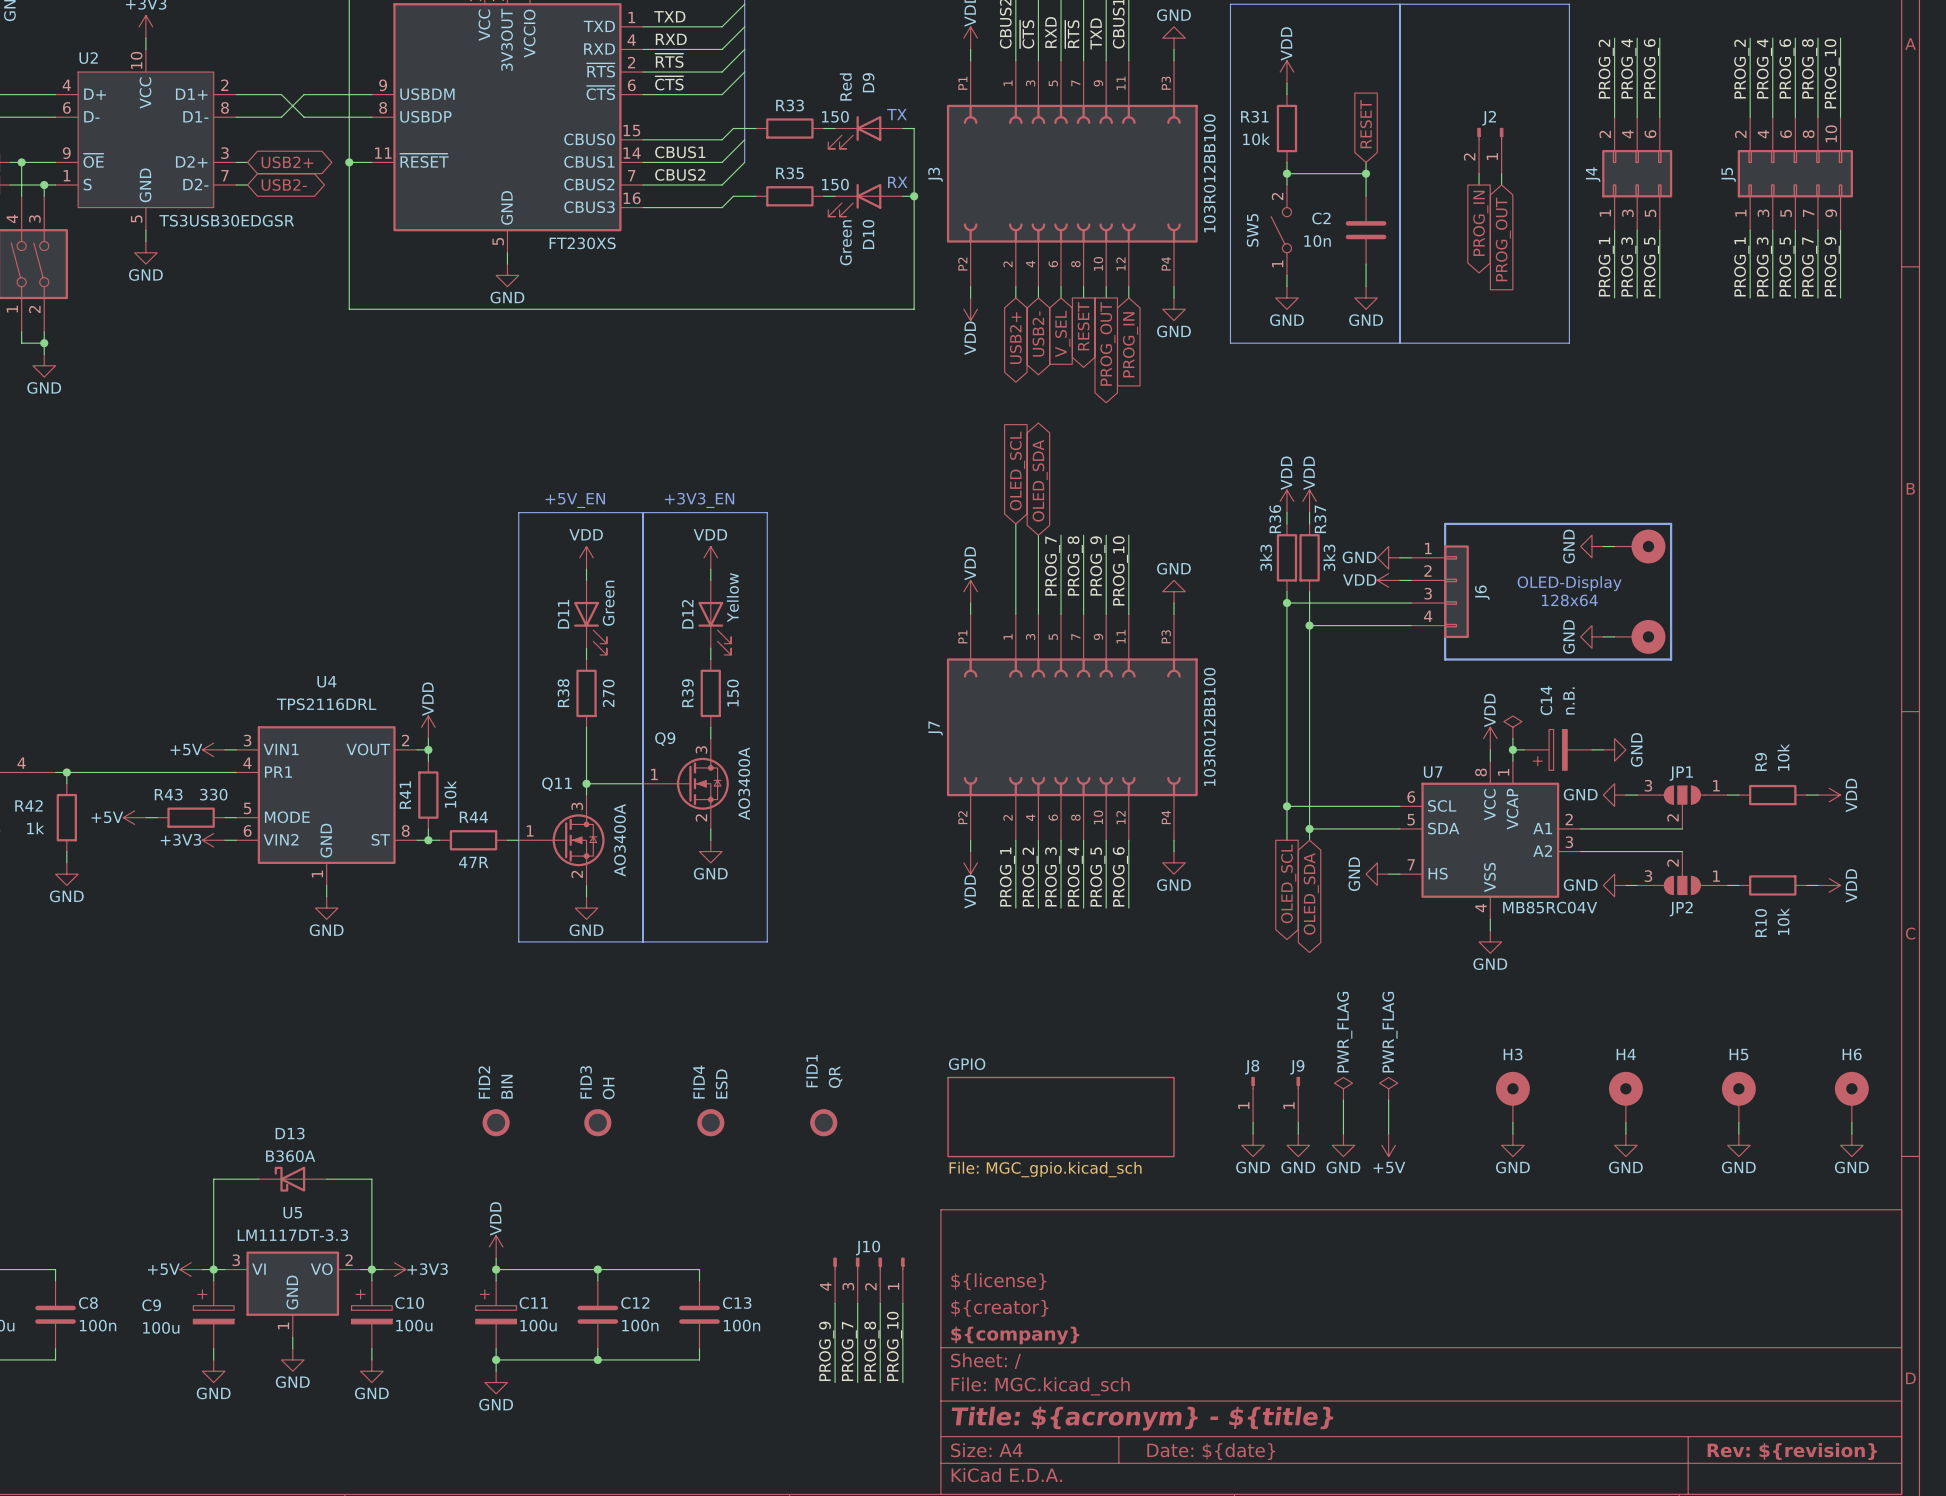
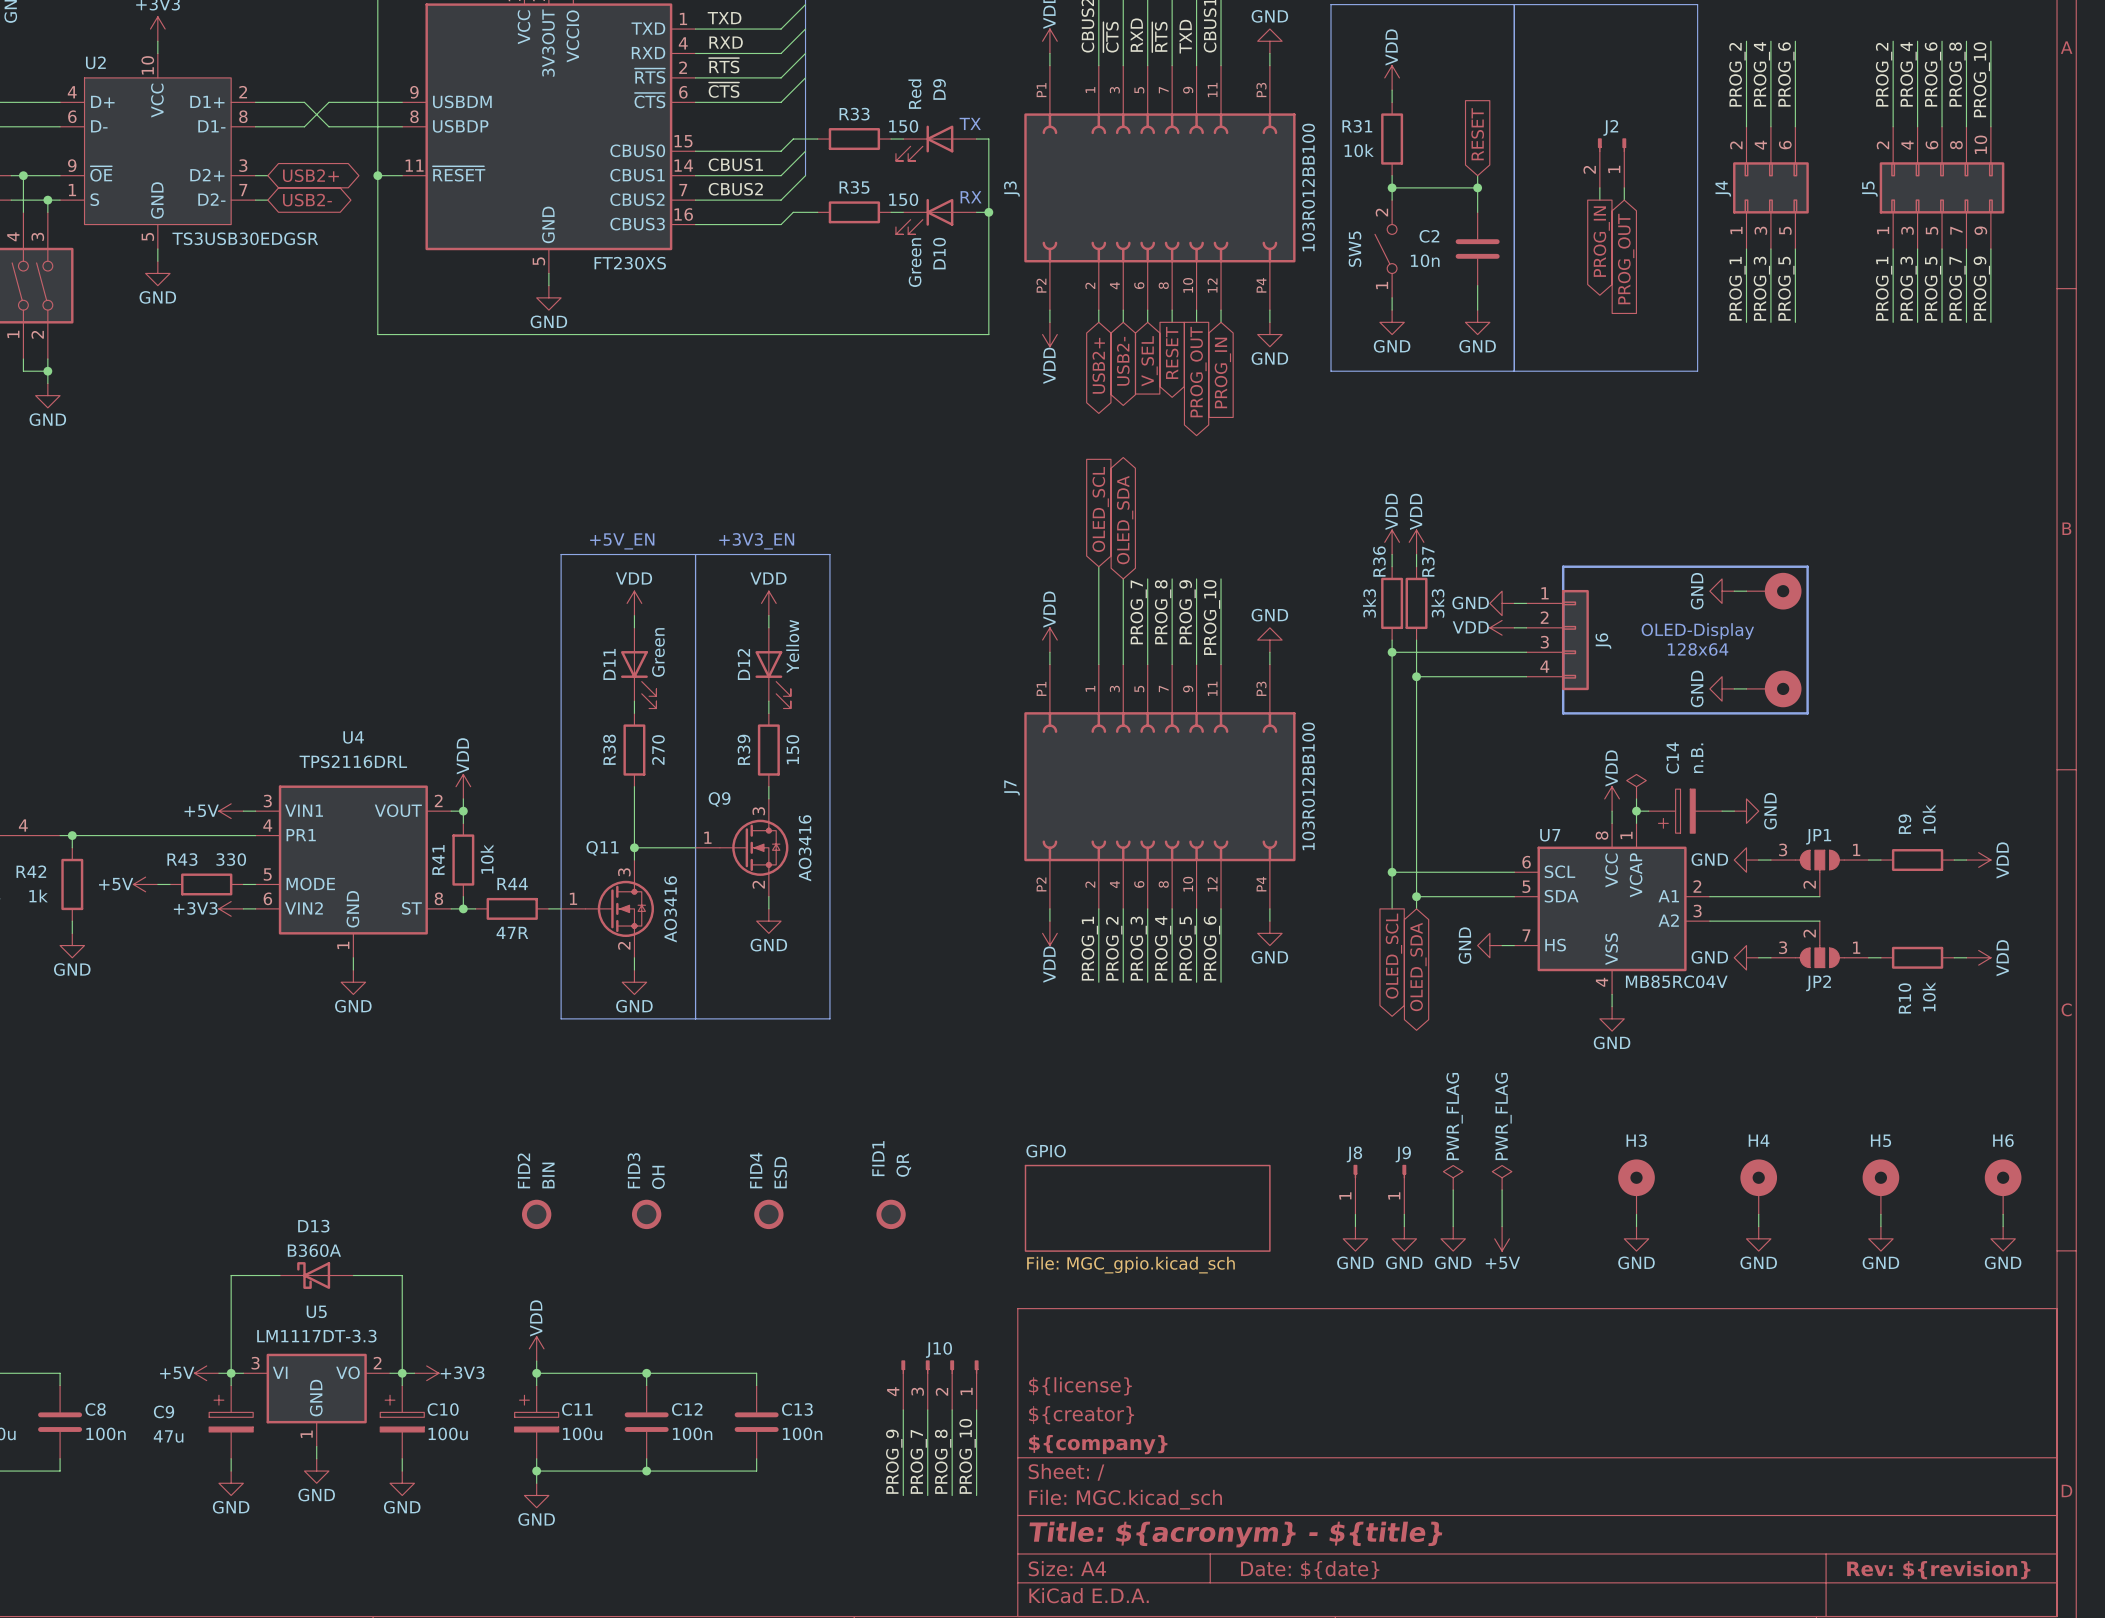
Q9 value: AO3400A (744, 783) -> AO3416 (805, 848)
Q11 value: AO3400A (620, 840) -> AO3416 (670, 909)
C9 value: 100u (161, 1327) -> 47u (168, 1436)

